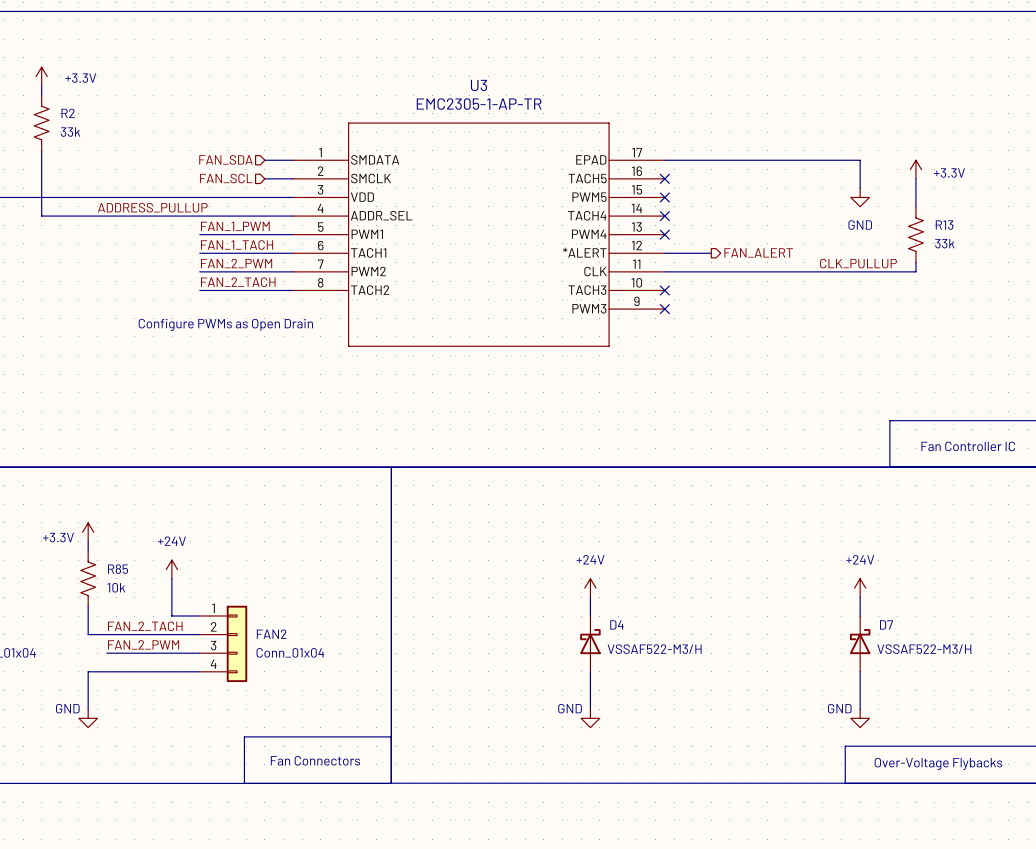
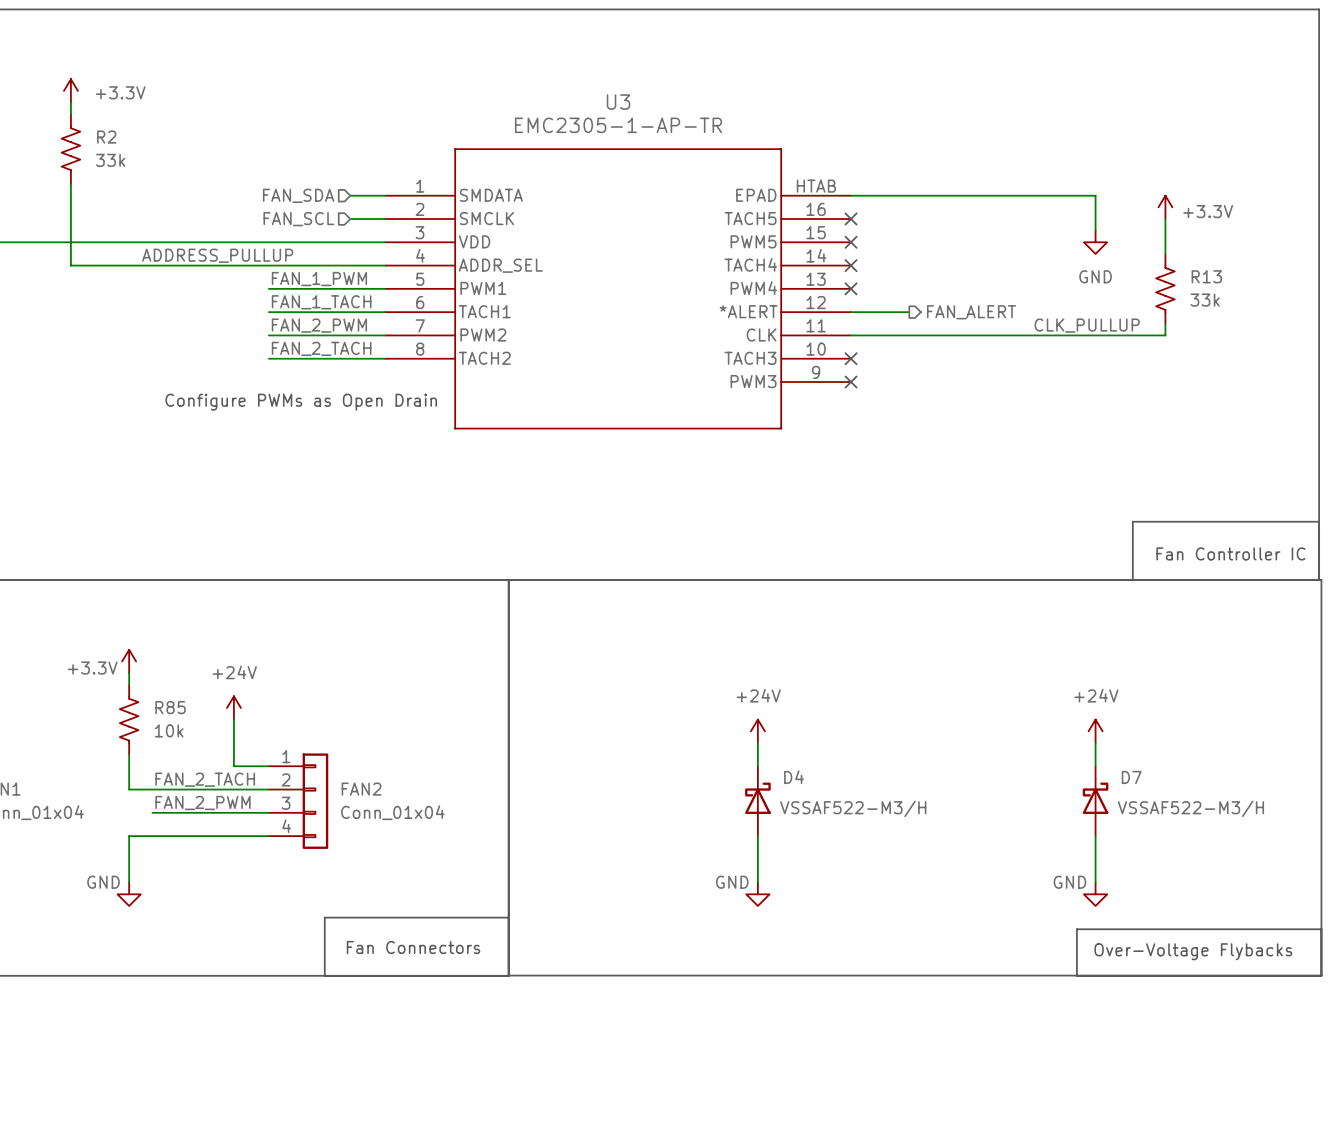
U3 pin number: 17 (637, 152) -> HTAB (816, 186)

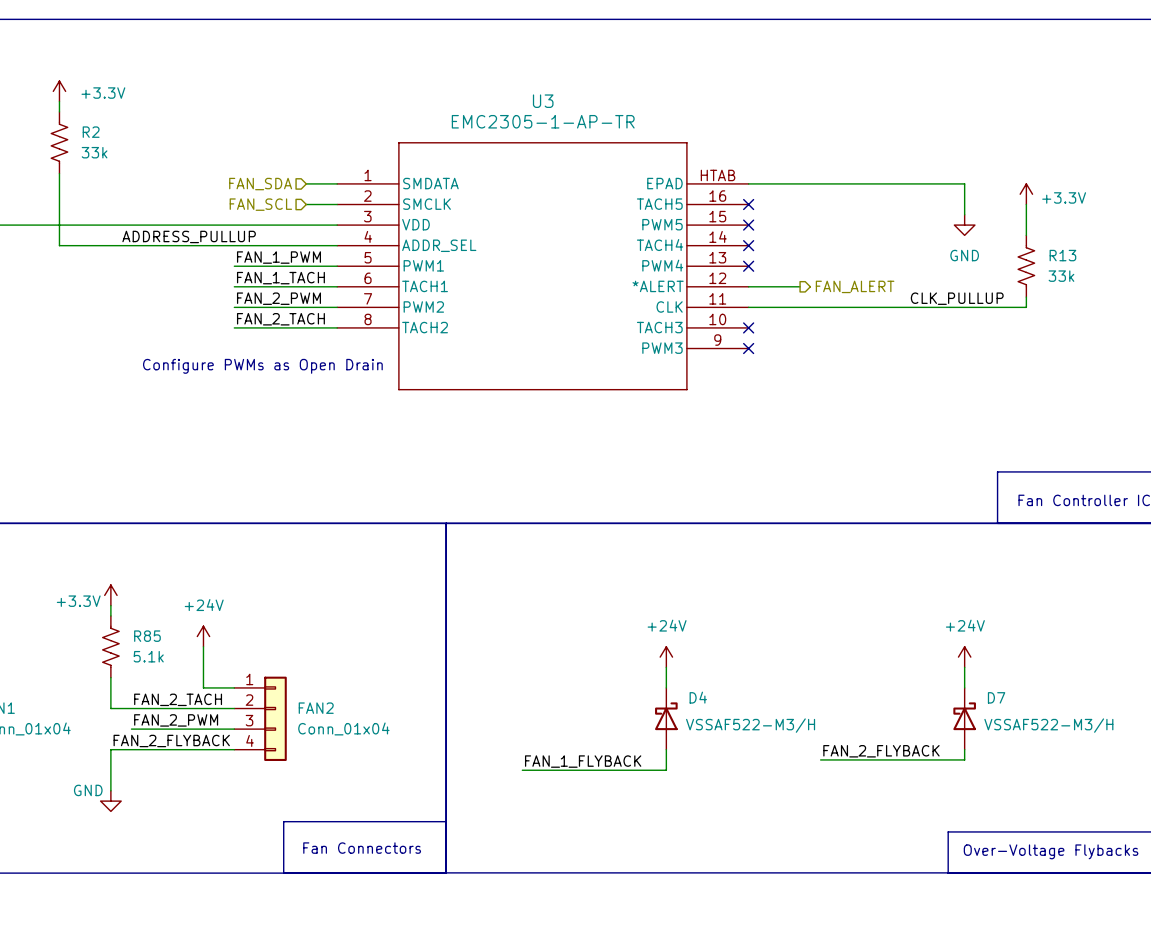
R85 value: 10k (169, 730) -> 5.1k (148, 656)
label: none -> FAN_2_FLYBACK (171, 740)
label: none -> FAN_2_FLYBACK (881, 751)
wire: (1095, 847) (1095, 882) -> (964, 759) (820, 759)
label: none -> FAN_1_FLYBACK (583, 761)
wire: (757, 859) (757, 882) -> (666, 770) (522, 770)
power symbol: GND (757, 894) -> none
power symbol: GND (1095, 894) -> none

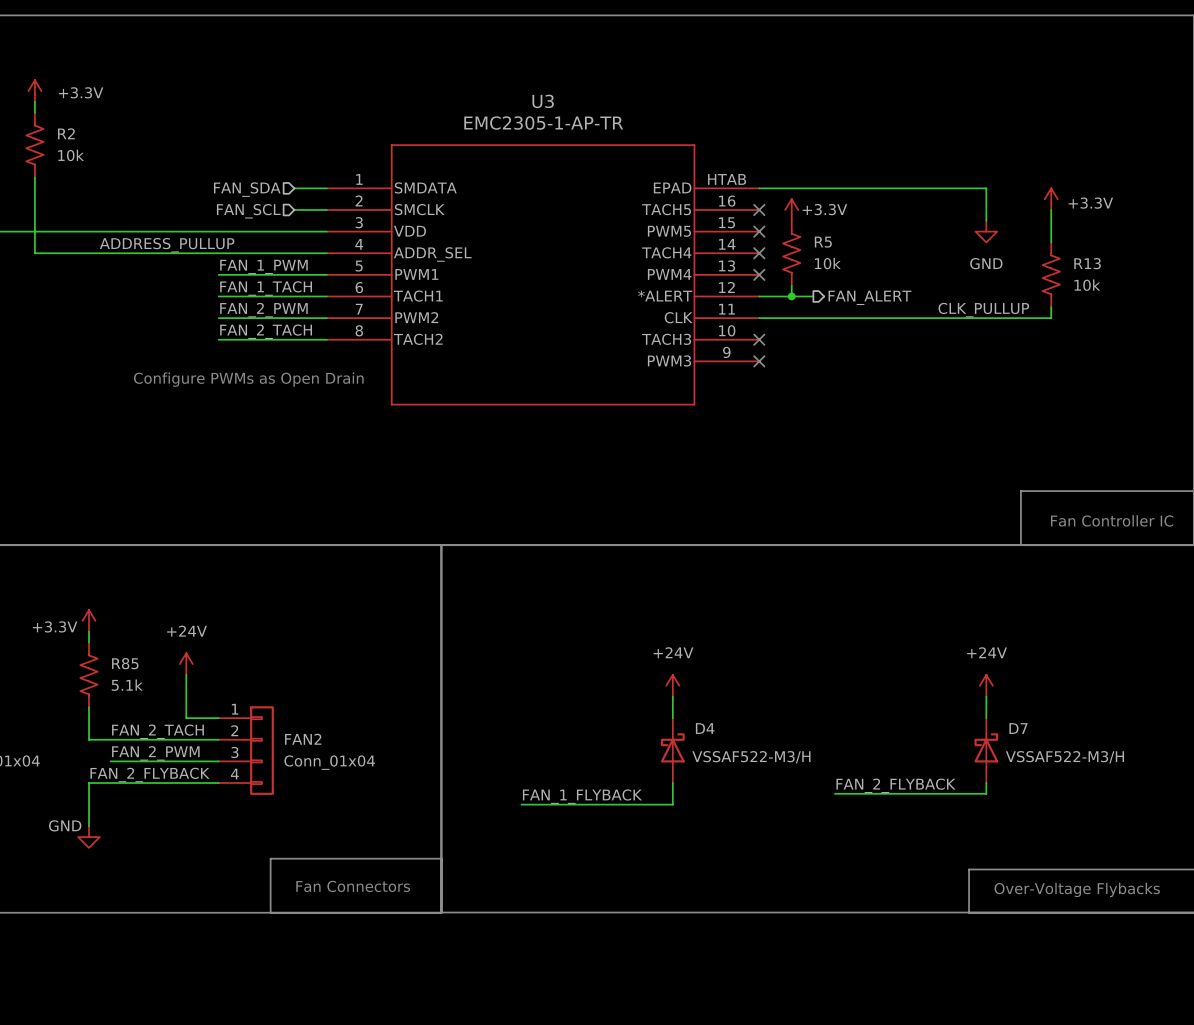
R2 value: 33k (94, 152) -> 10k (71, 155)
power symbol: none -> +3.3V (791, 209)
R5: none -> 10k (791, 253)
wire: none -> (791, 285) (791, 296)
R13 value: 33k (1061, 276) -> 10k (1087, 285)
junction: none -> (791, 296)

